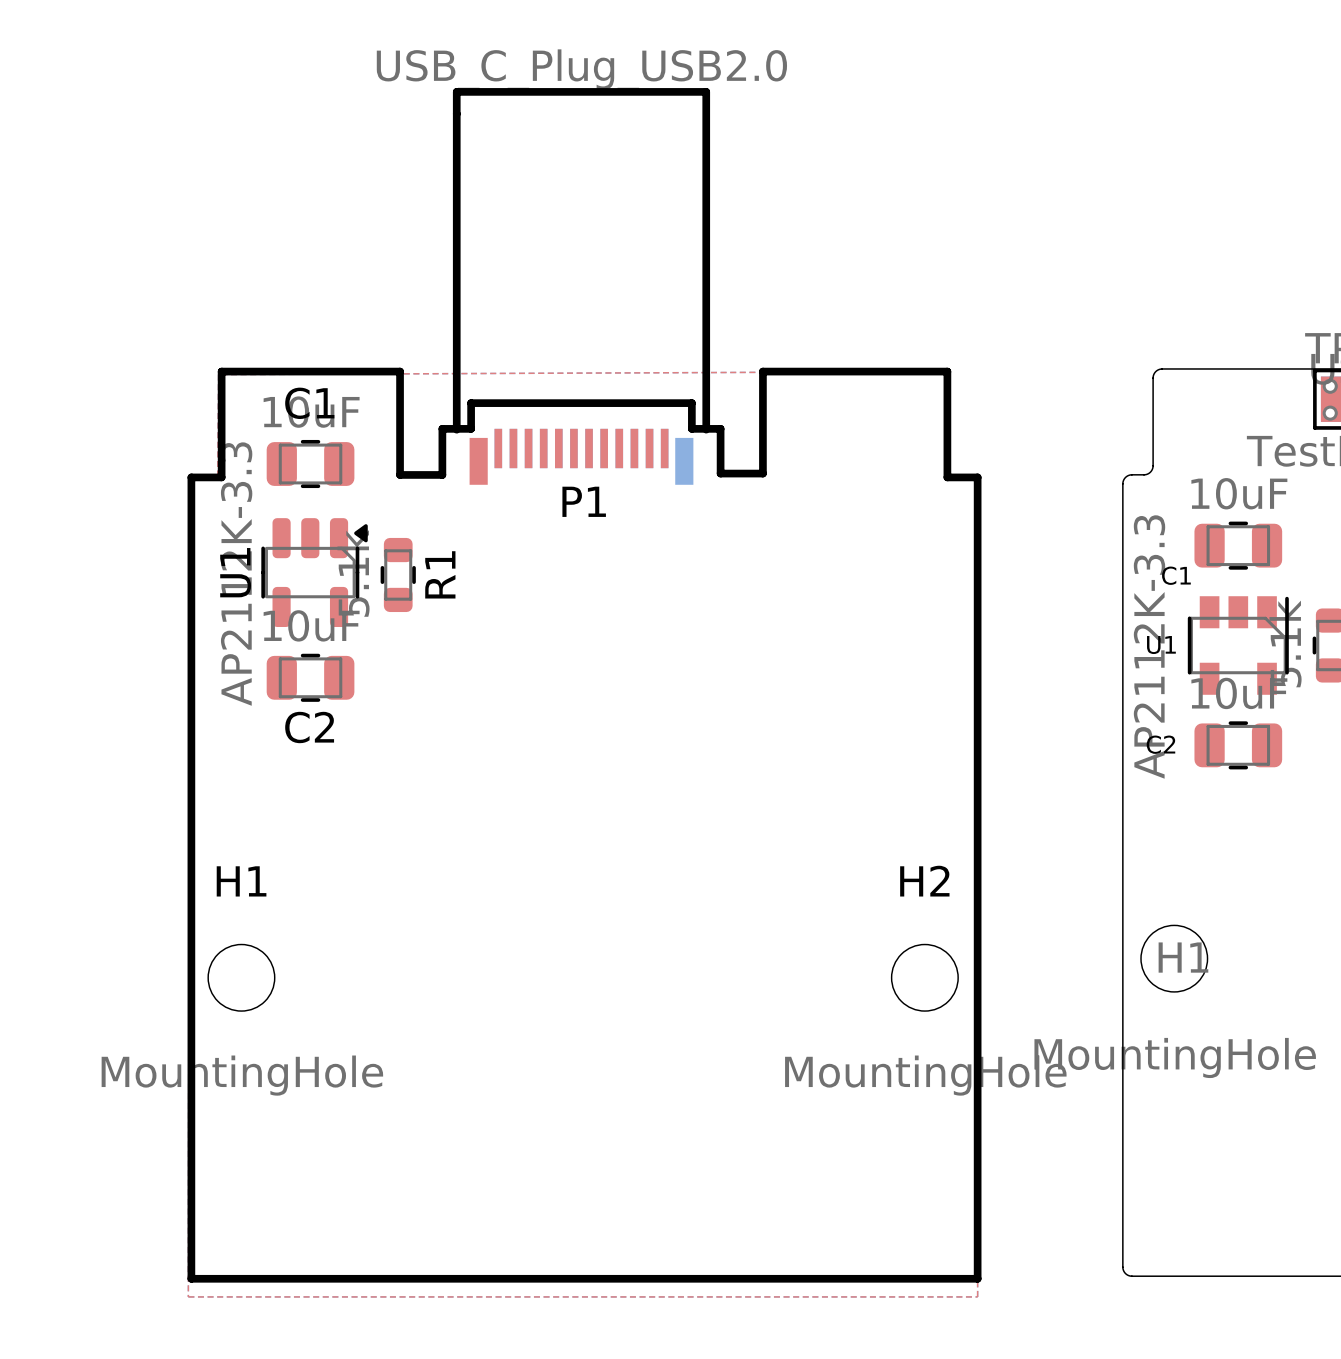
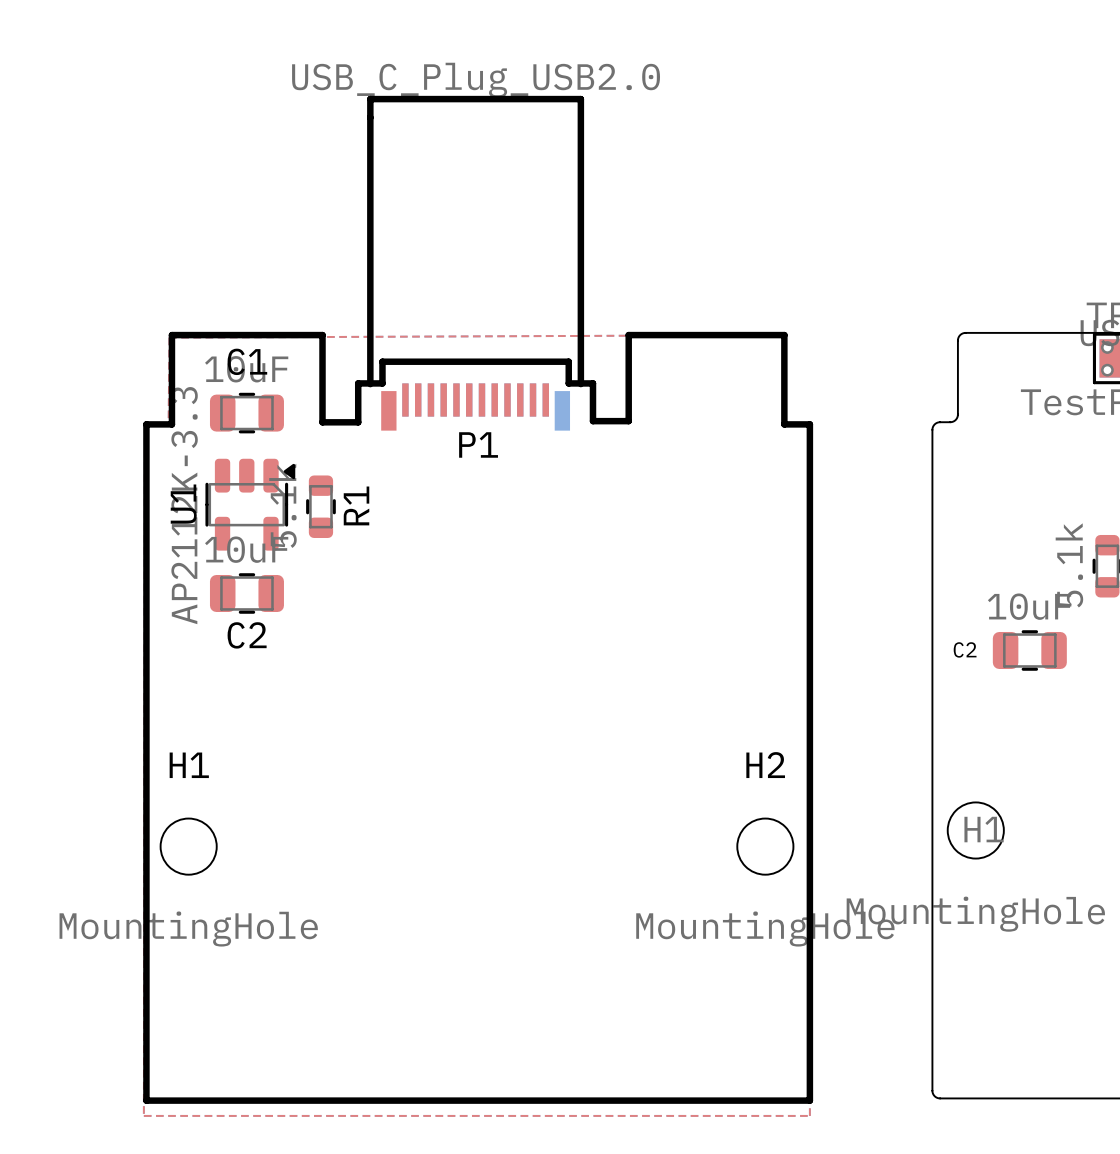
C1: 10uF (1238, 545) -> none
U1: AP2112K-3.3 (1238, 645) -> none

